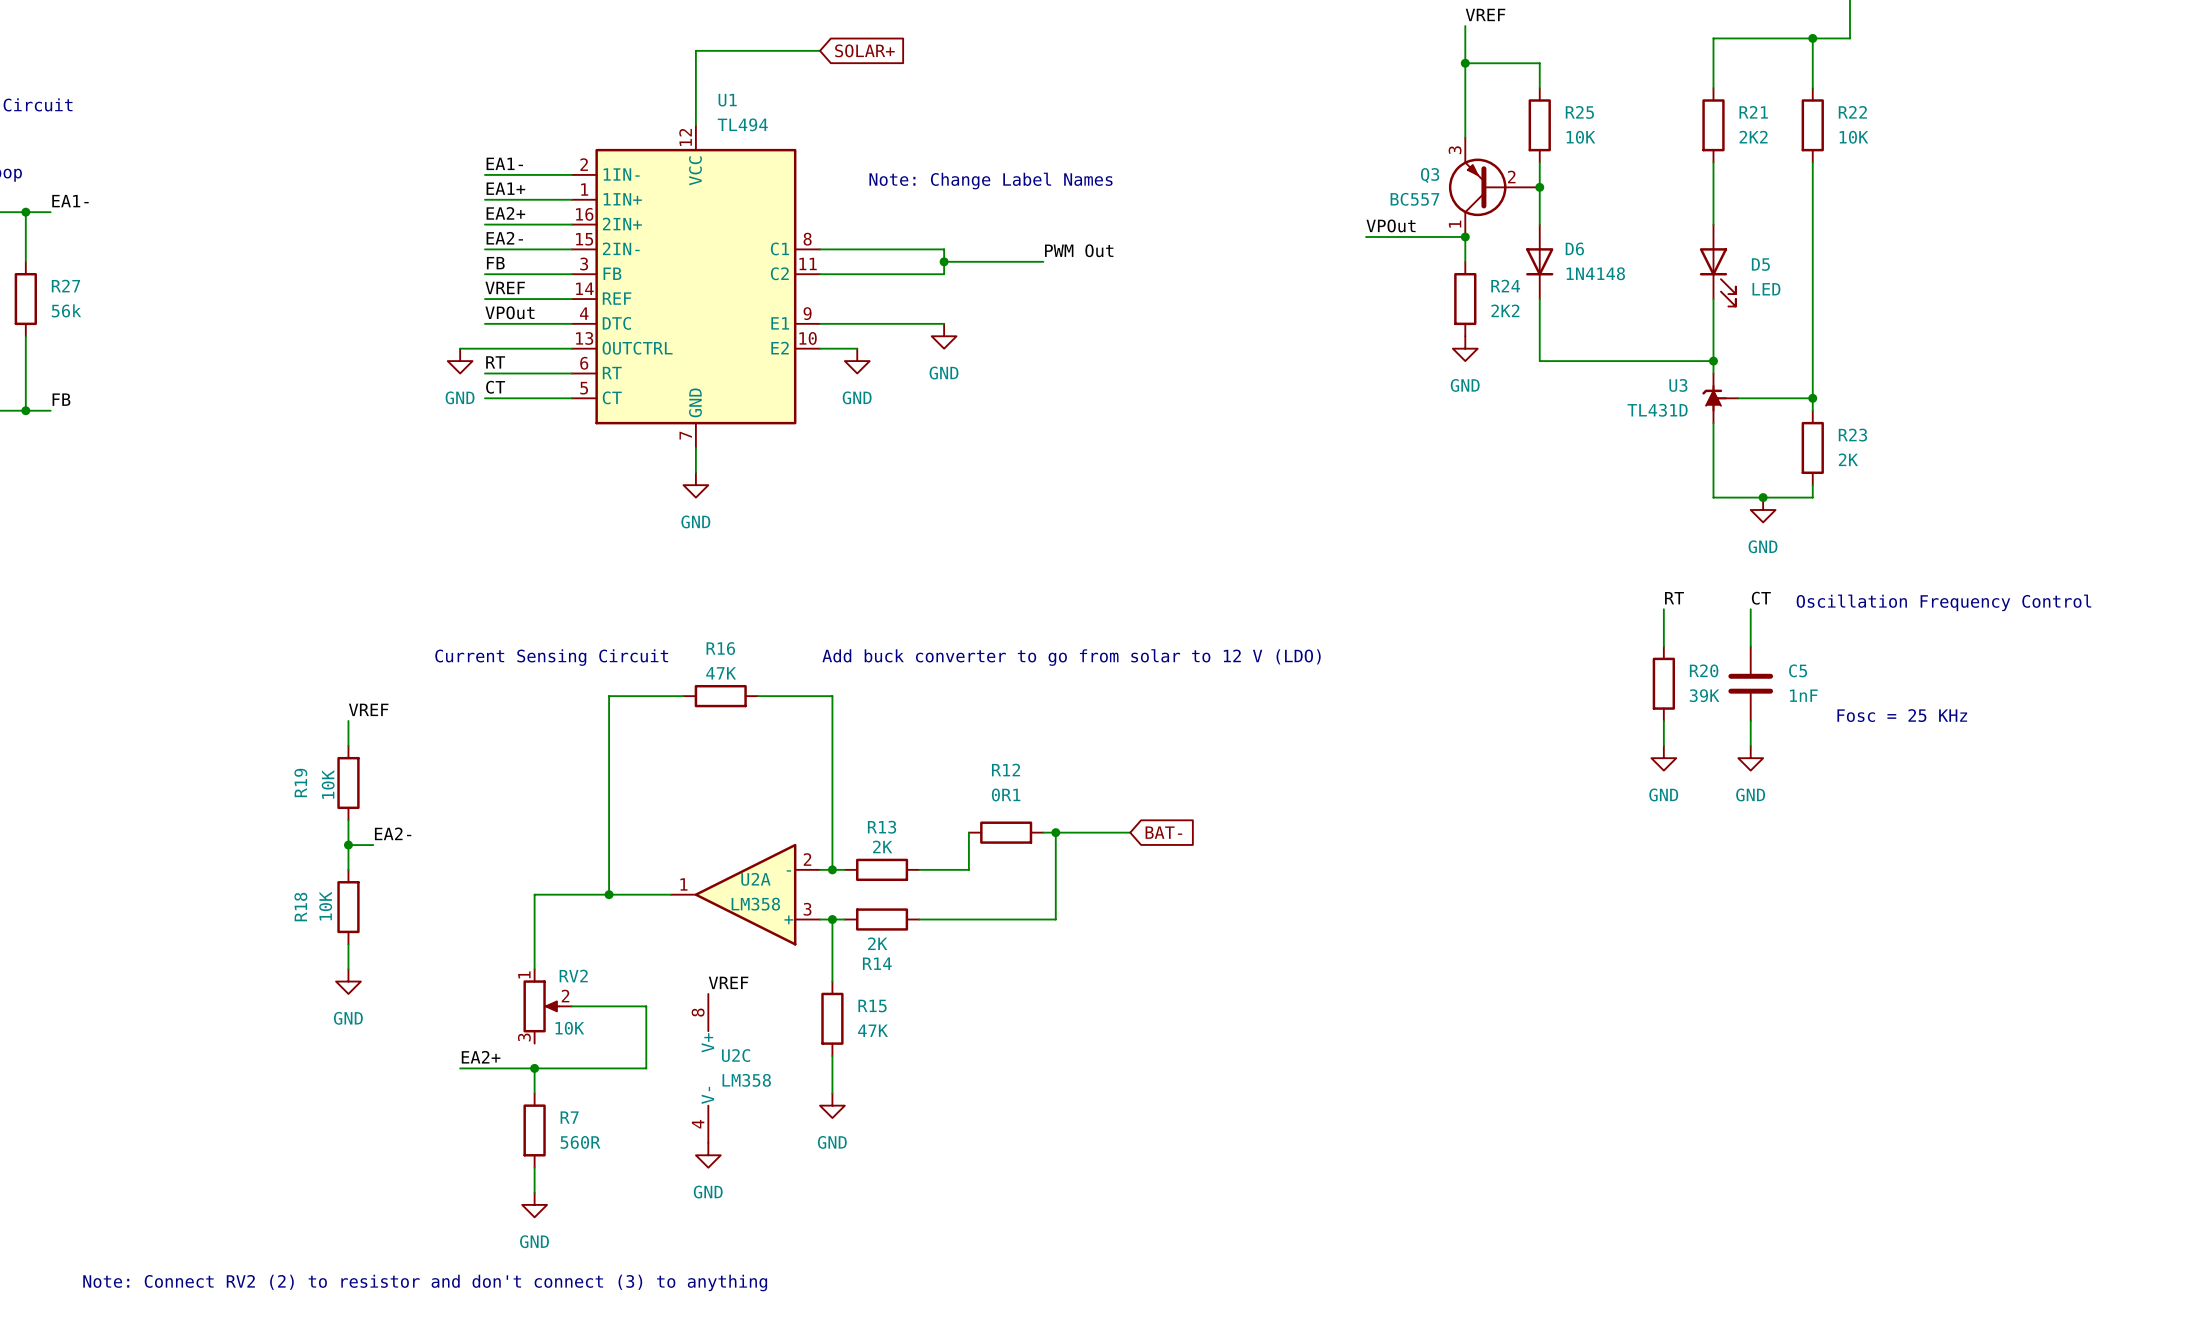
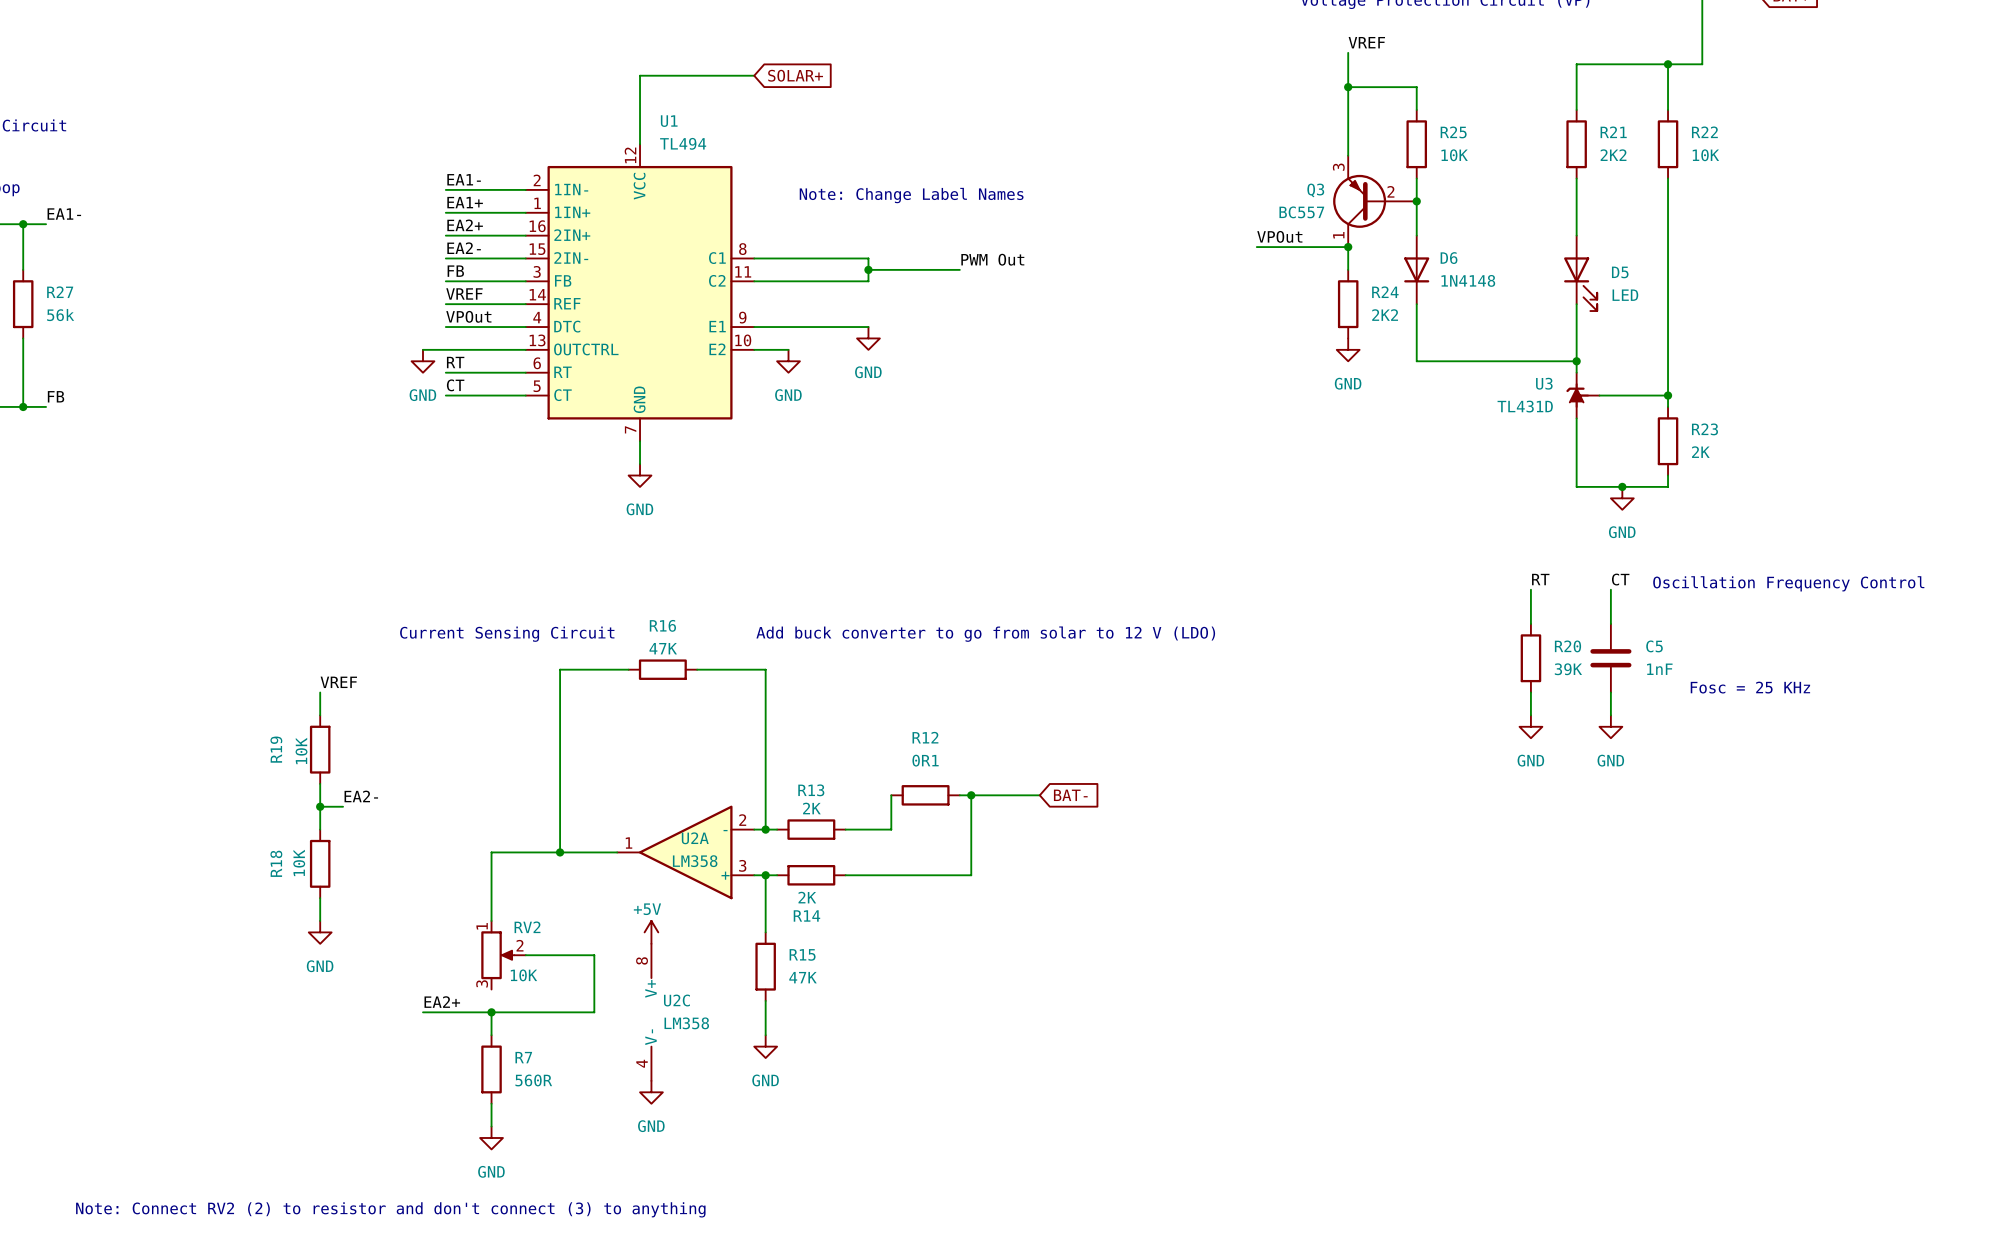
power symbol: none -> +5V (651, 932)
label: VREF (728, 982) -> none

